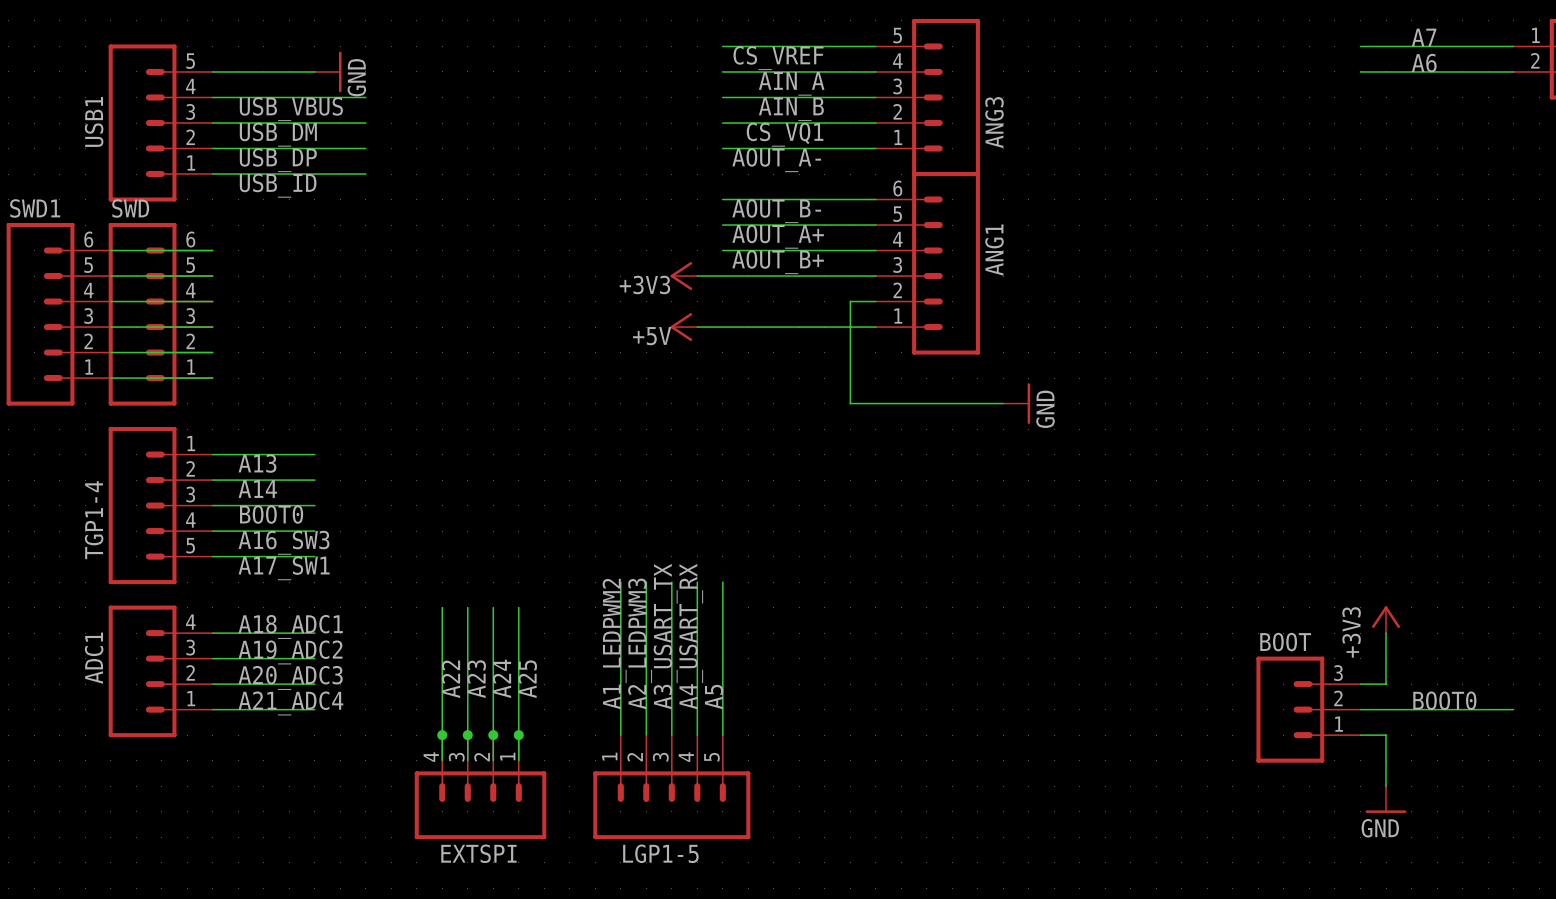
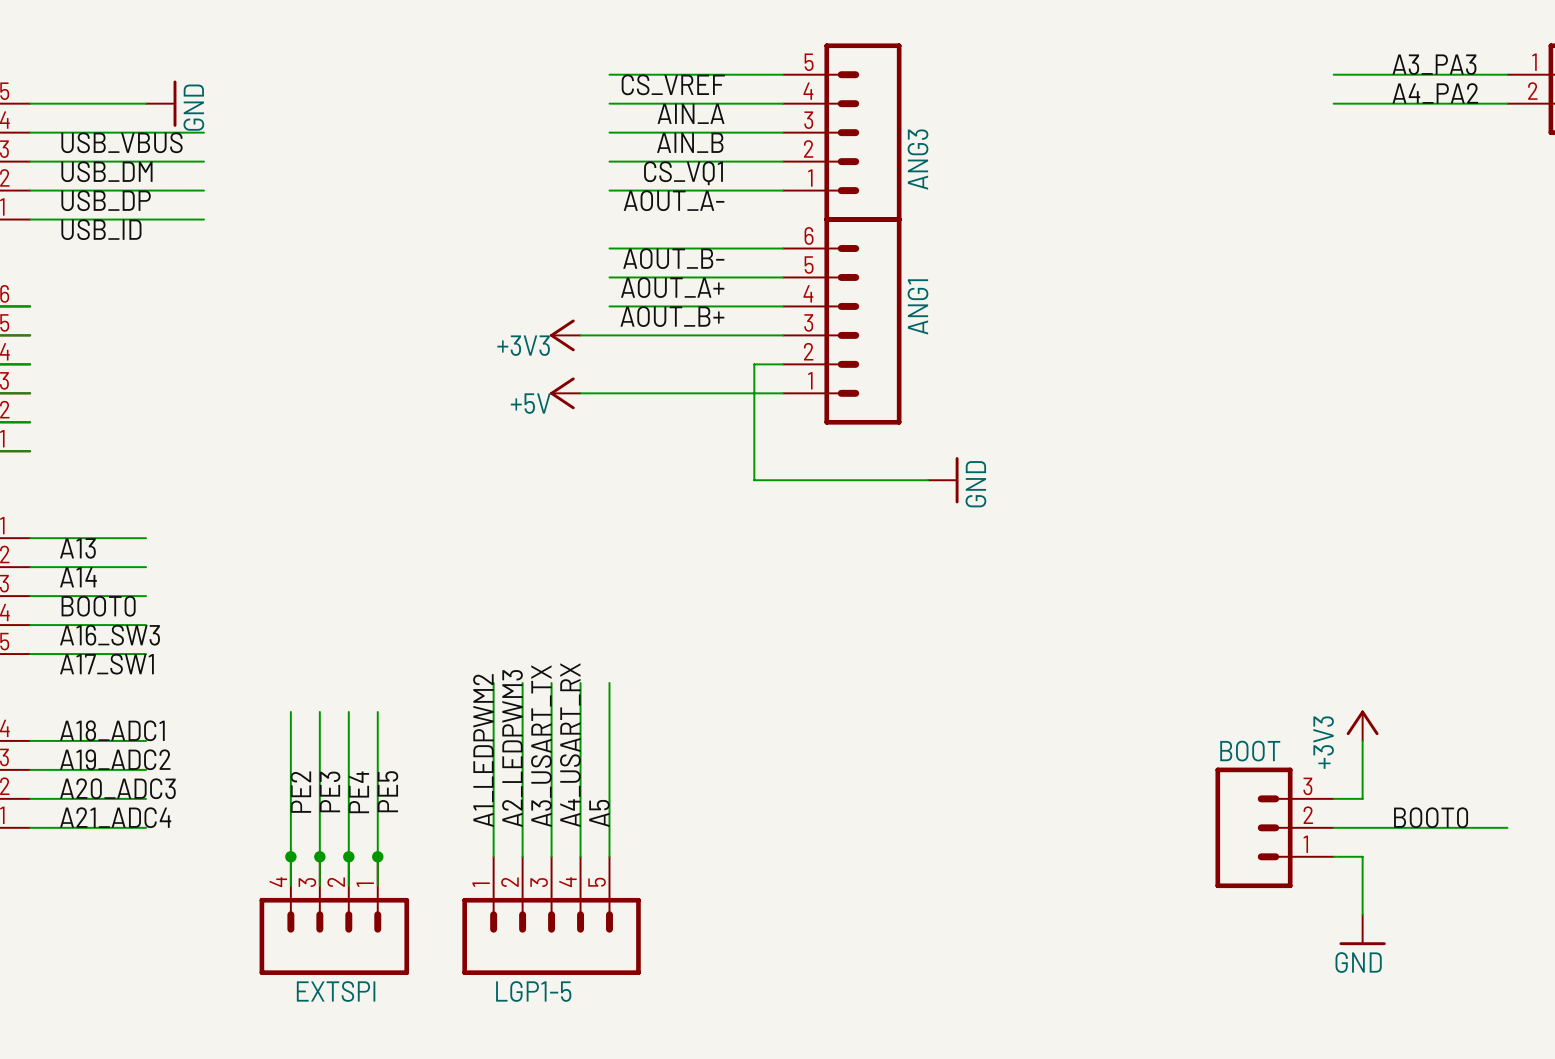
label: A7 (1424, 37) -> A3_PA3 (1434, 64)
label: A6 (1424, 63) -> A4_PA2 (1435, 93)
label: A24 (502, 678) -> PE4 (358, 792)
label: A22 (451, 679) -> PE2 (300, 792)
label: A23 (476, 679) -> PE3 (330, 791)
label: A25 (527, 679) -> PE5 (387, 791)

